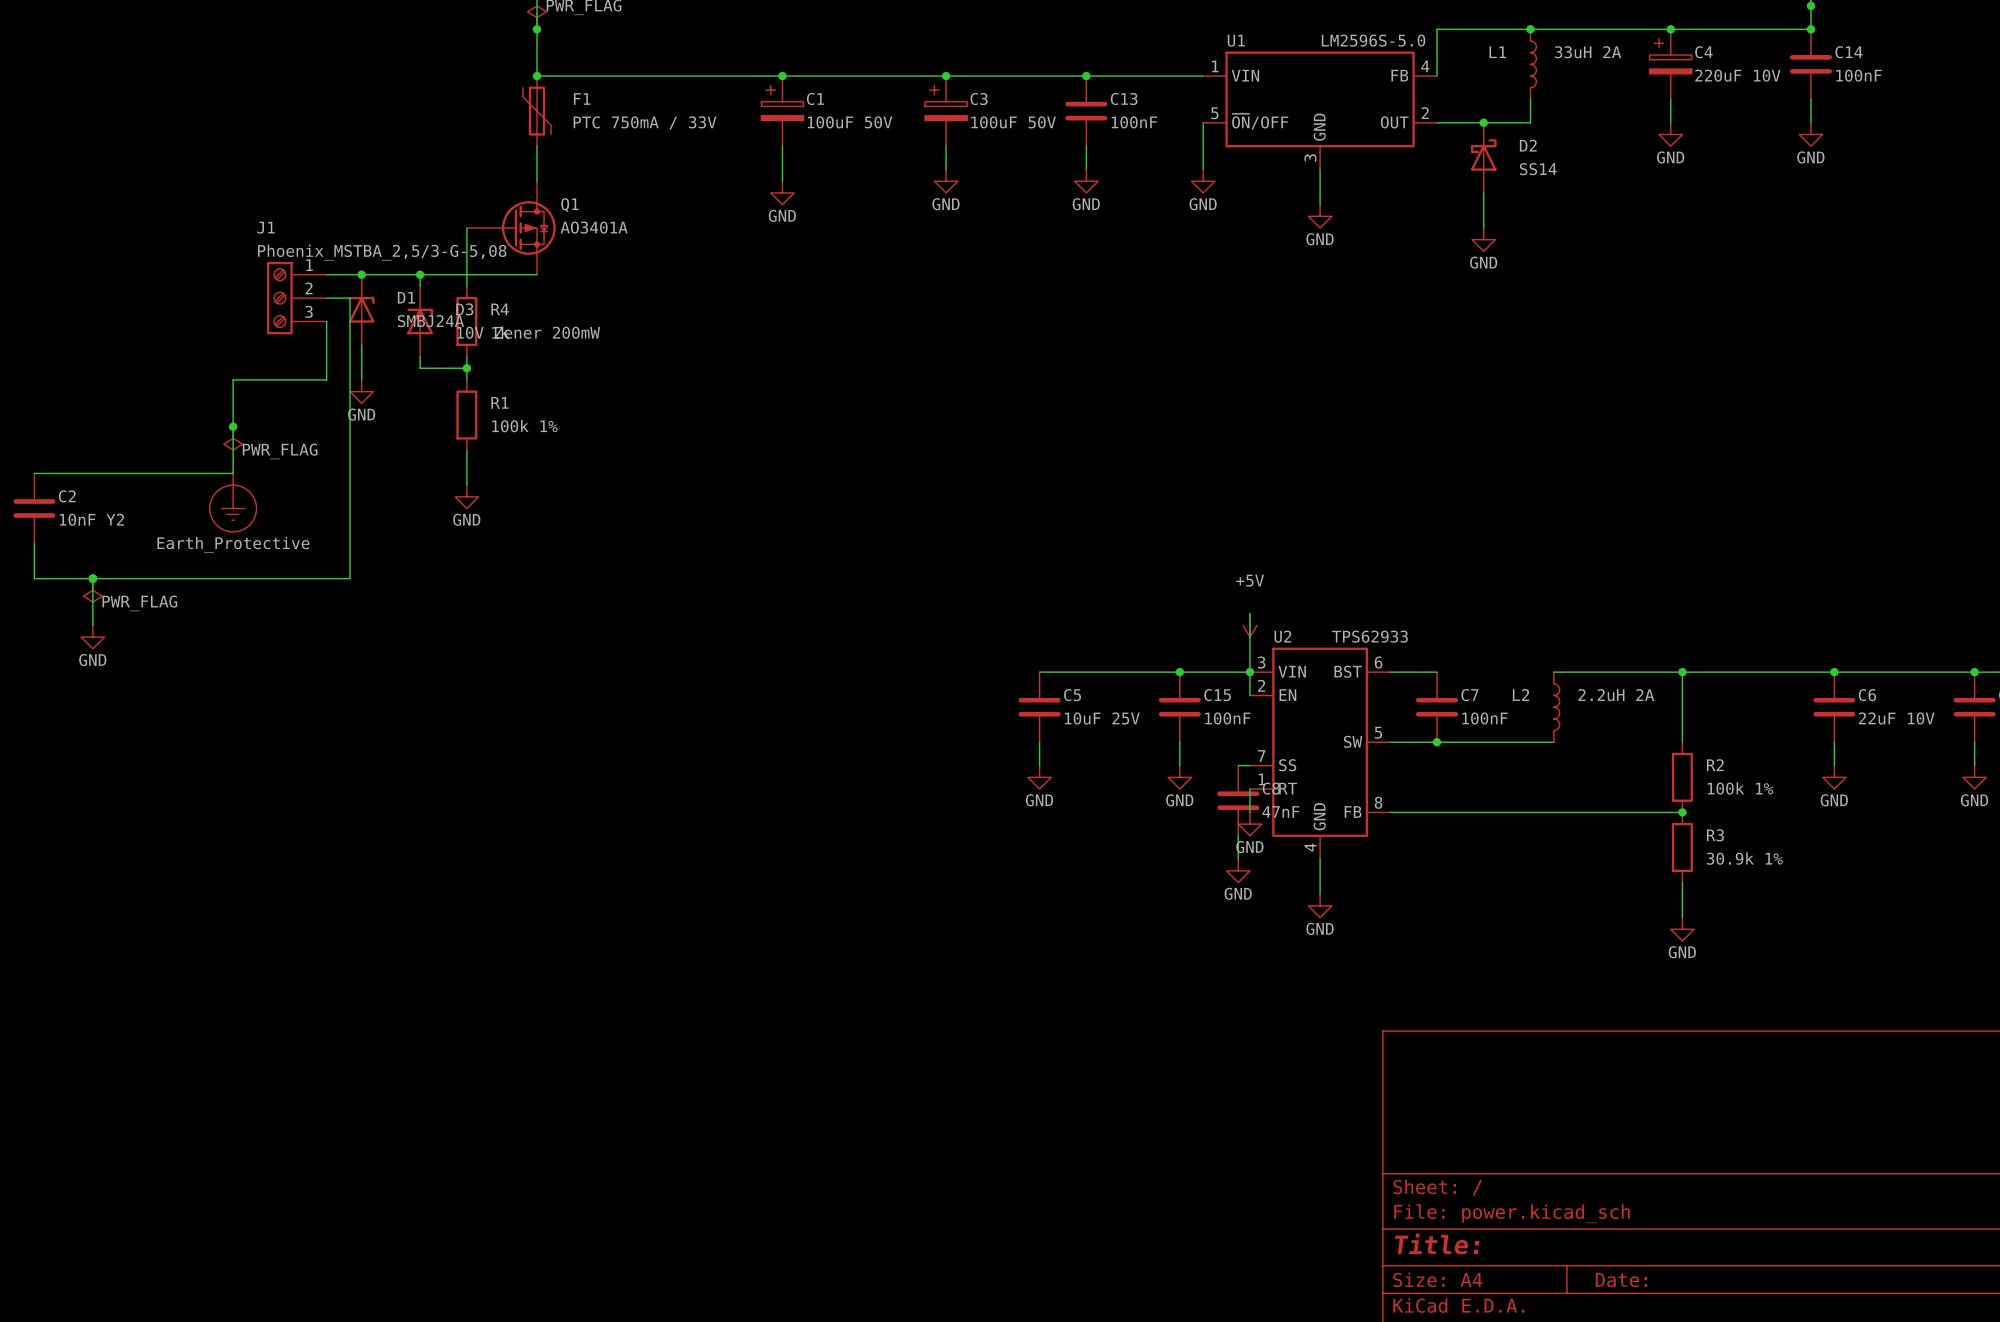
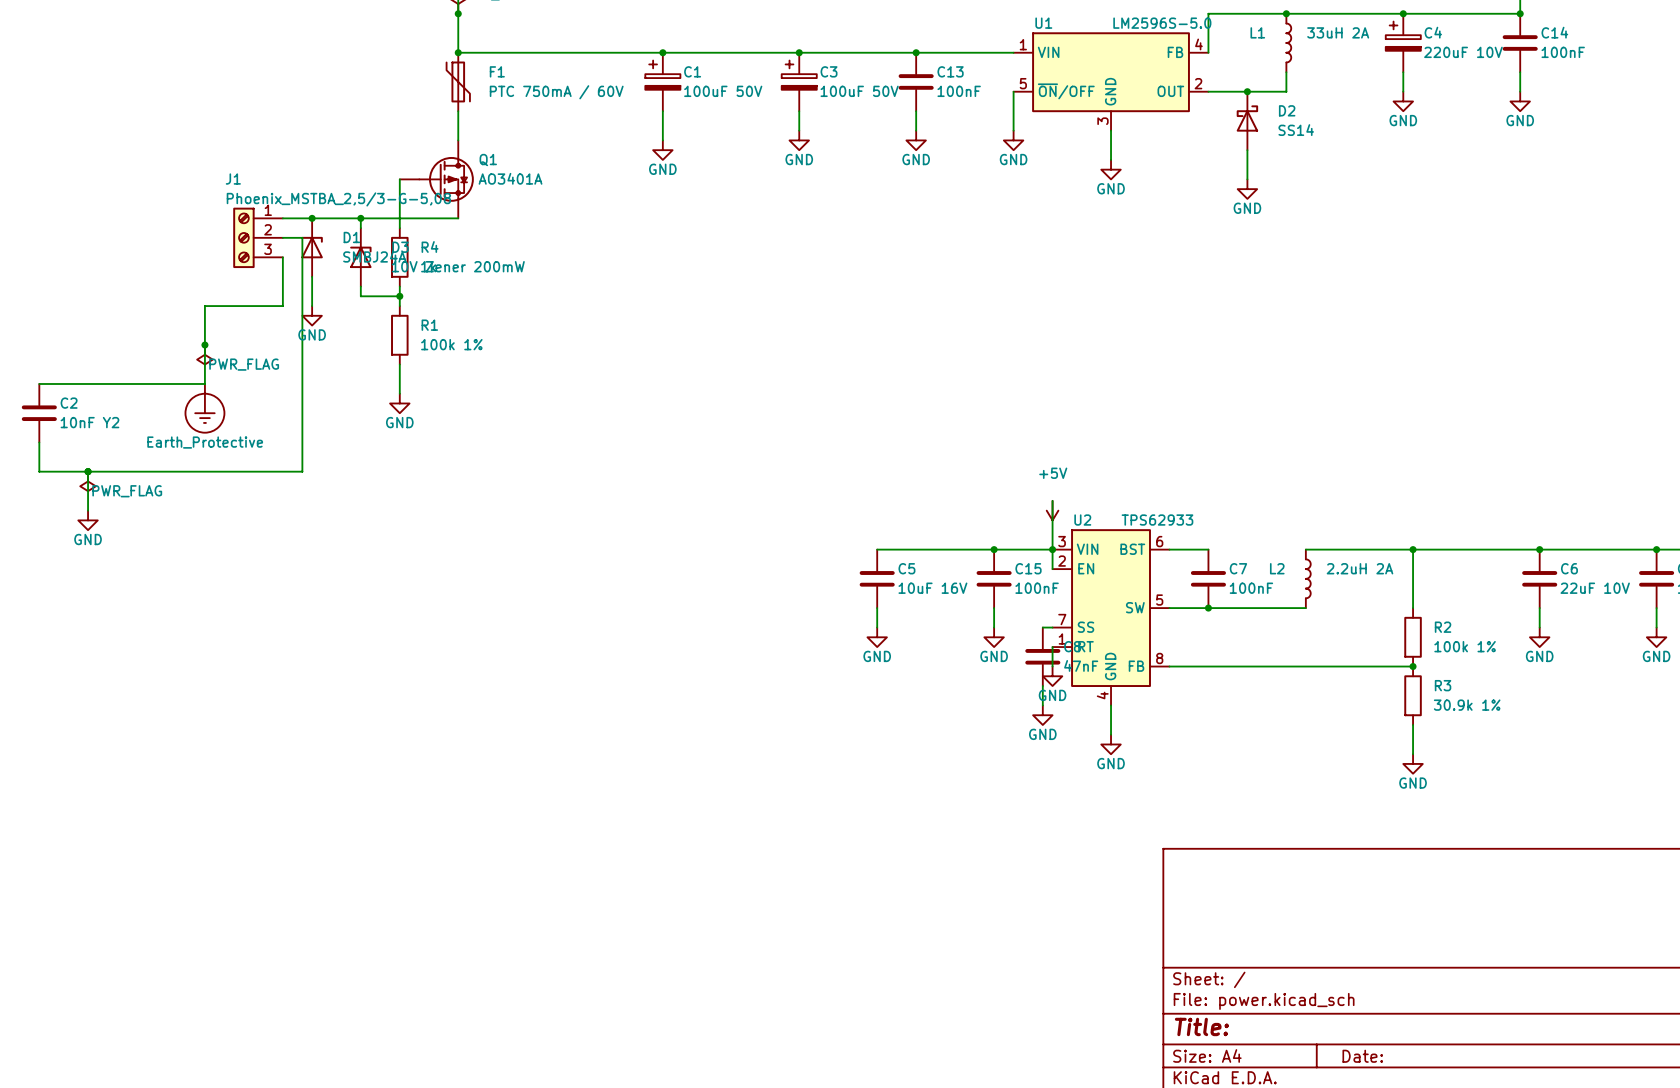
F1 value: PTC 750mA / 33V (645, 123) -> PTC 750mA / 60V (556, 92)
C5 value: 10uF 25V (1102, 718) -> 10uF 16V (932, 588)

